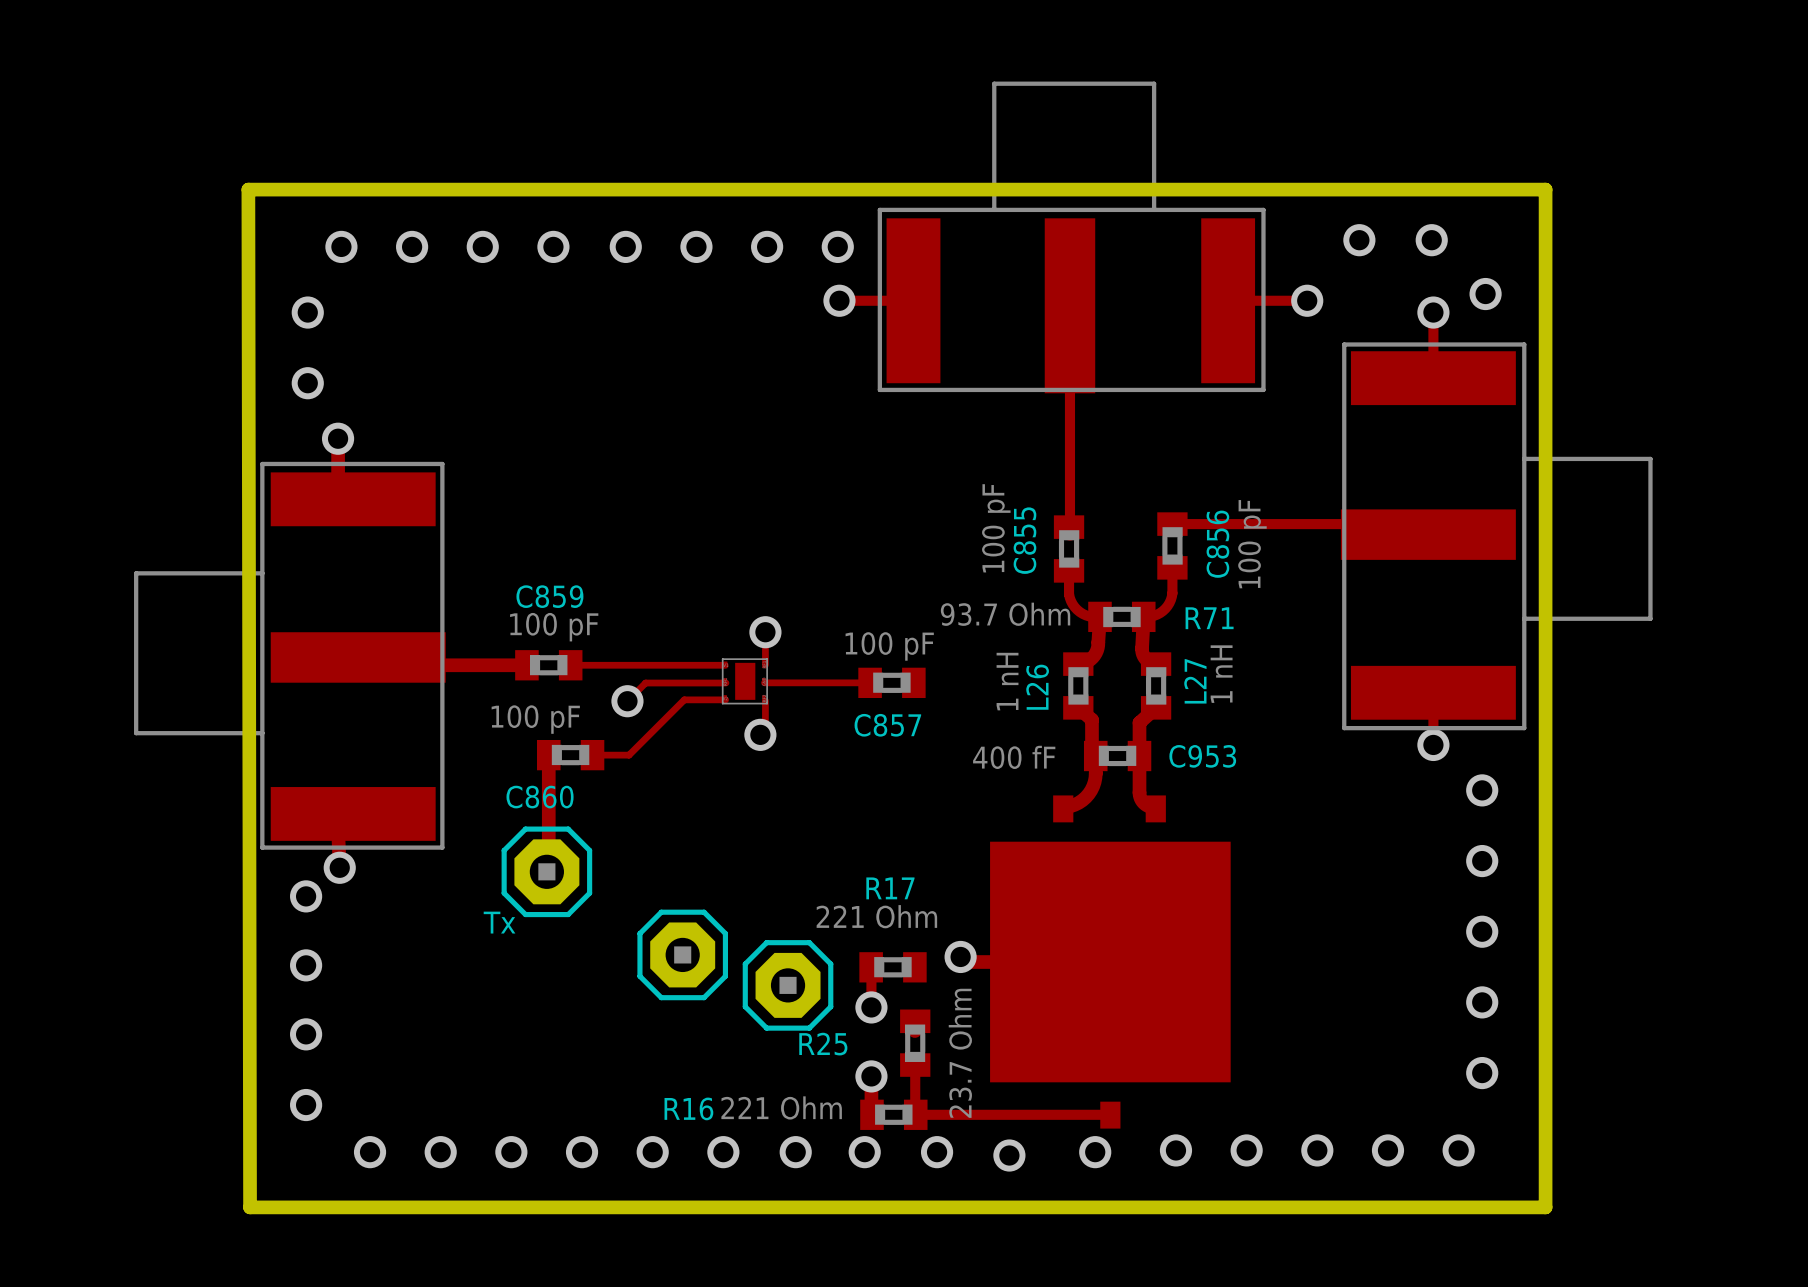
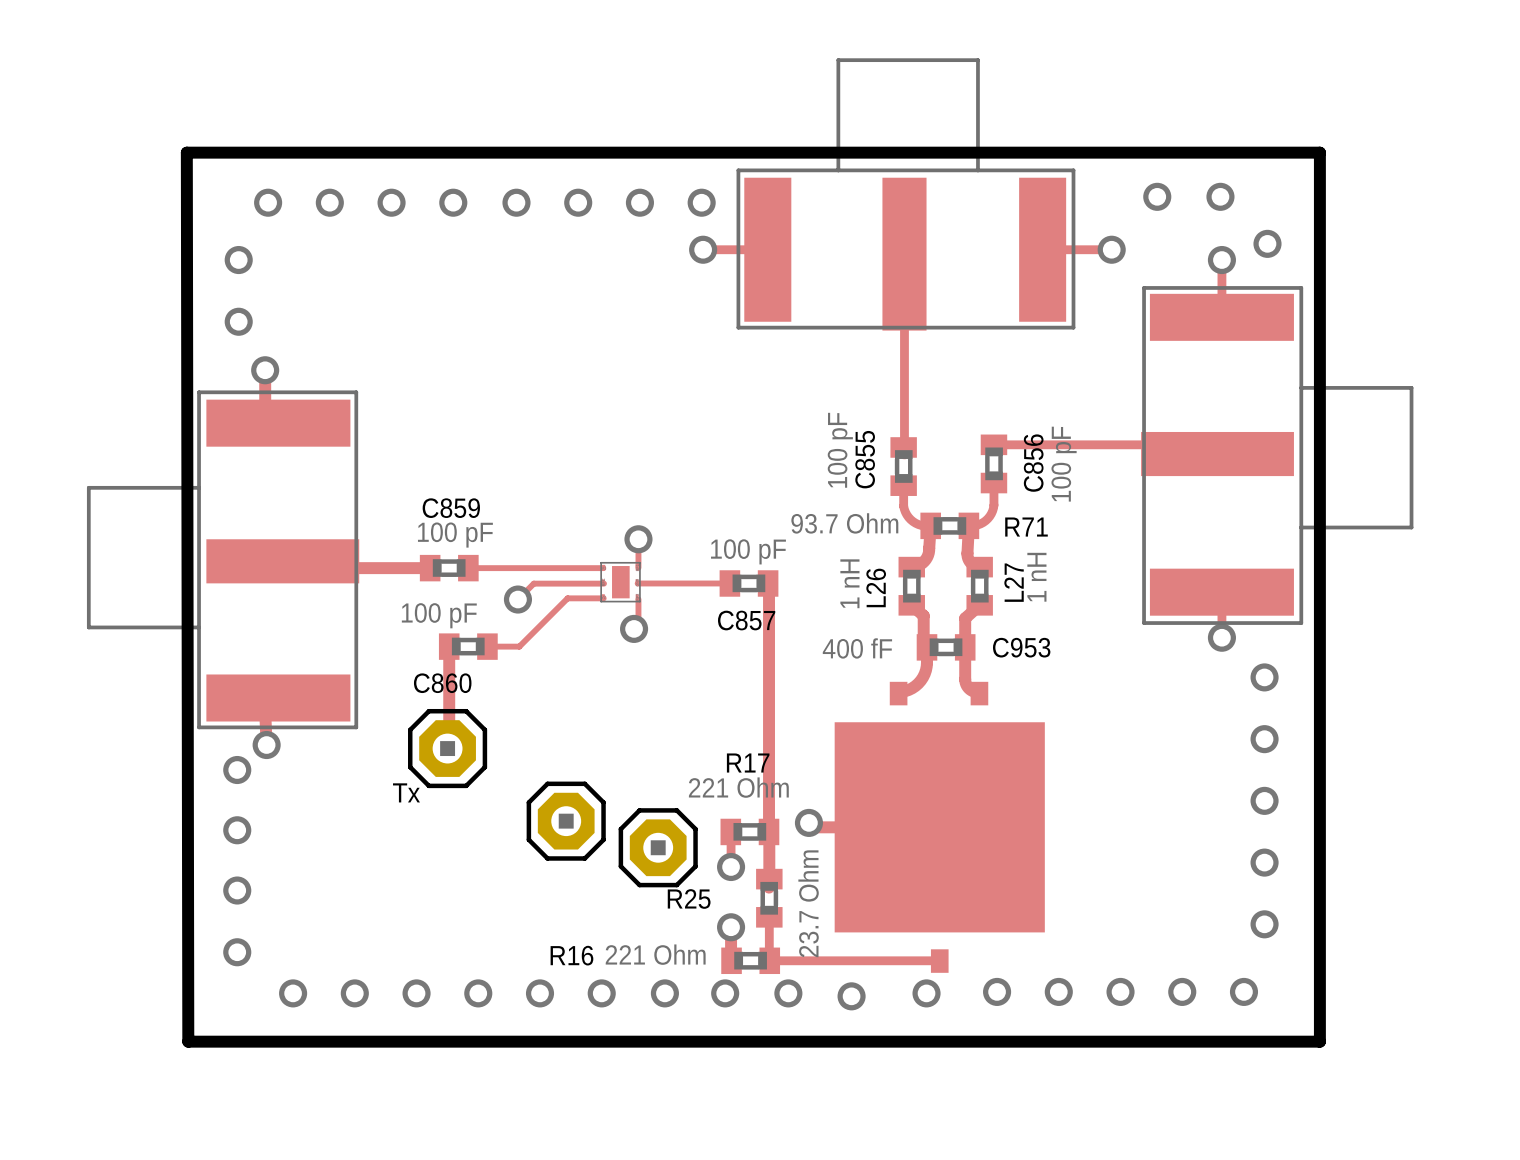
track: none -> (768, 583) (769, 831)
track: none -> (769, 831) (769, 879)

